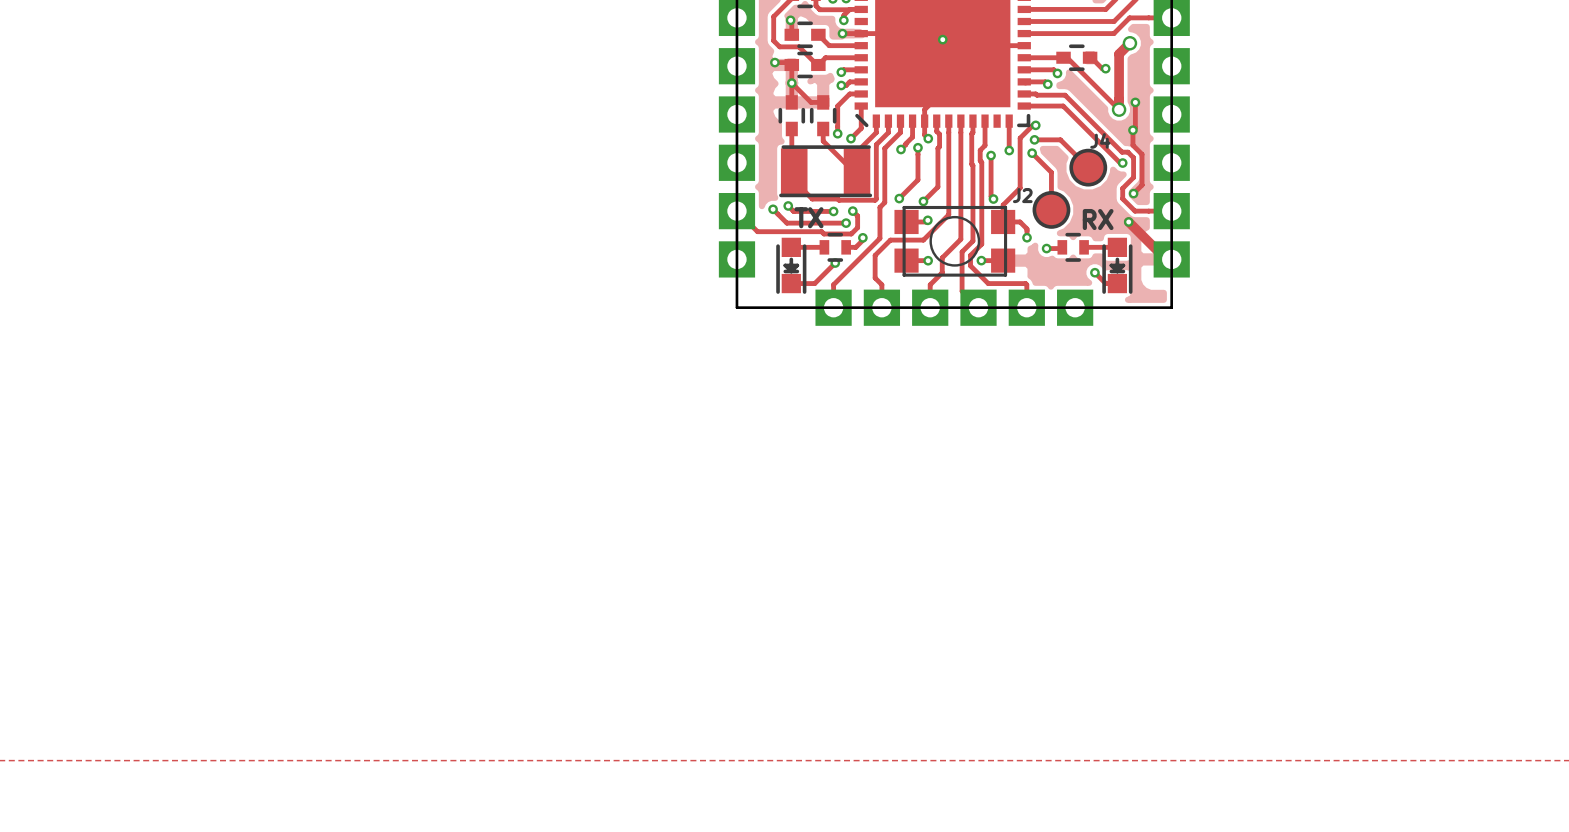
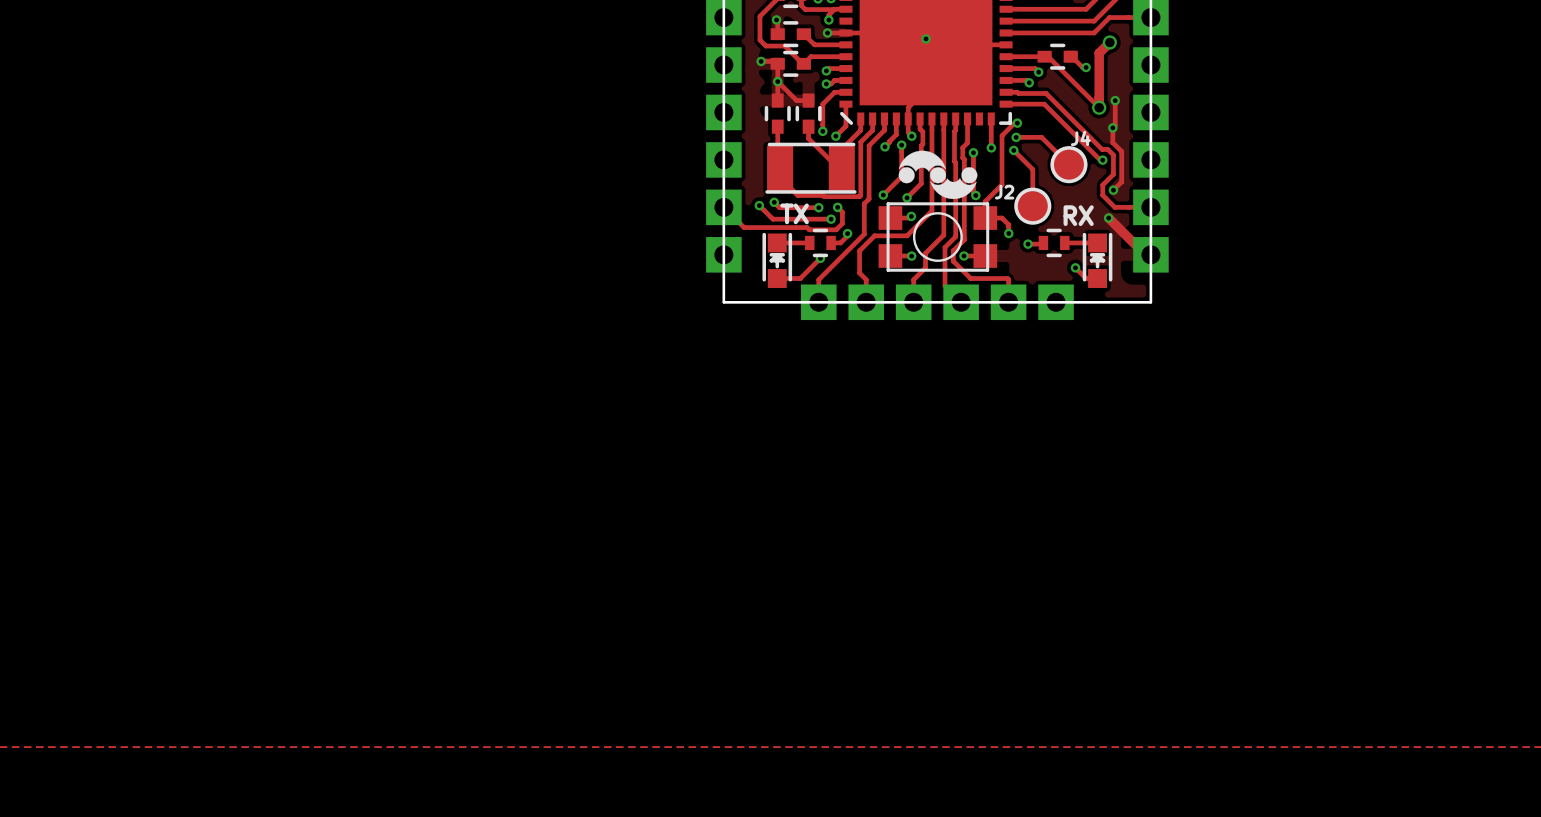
drawing: none -> [898, 150, 978, 200]
part rotation: 0° (791, 265) -> 180° (777, 260)
part rotation: 0° (1117, 265) -> 180° (1097, 260)

